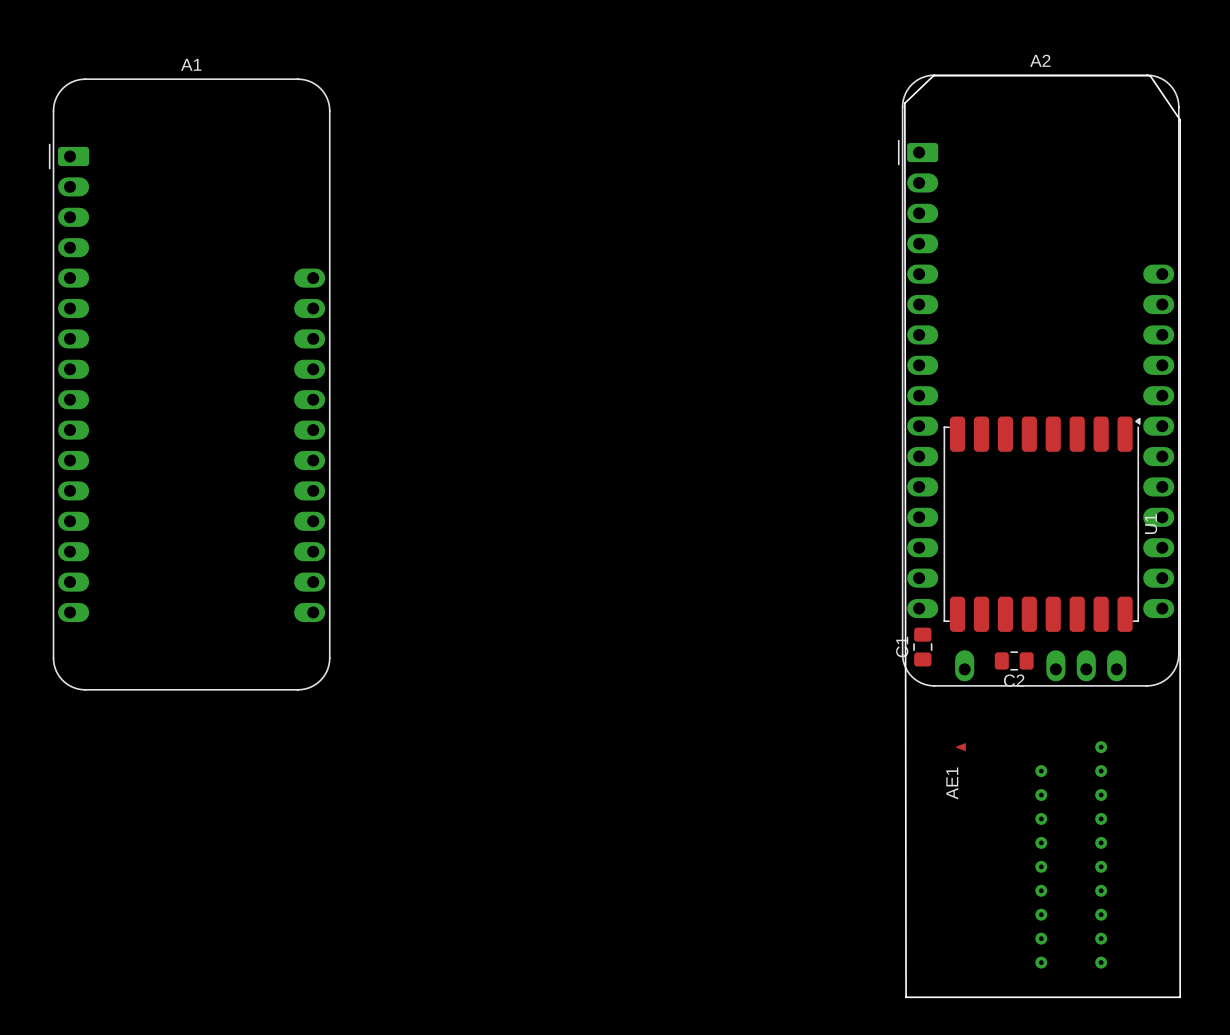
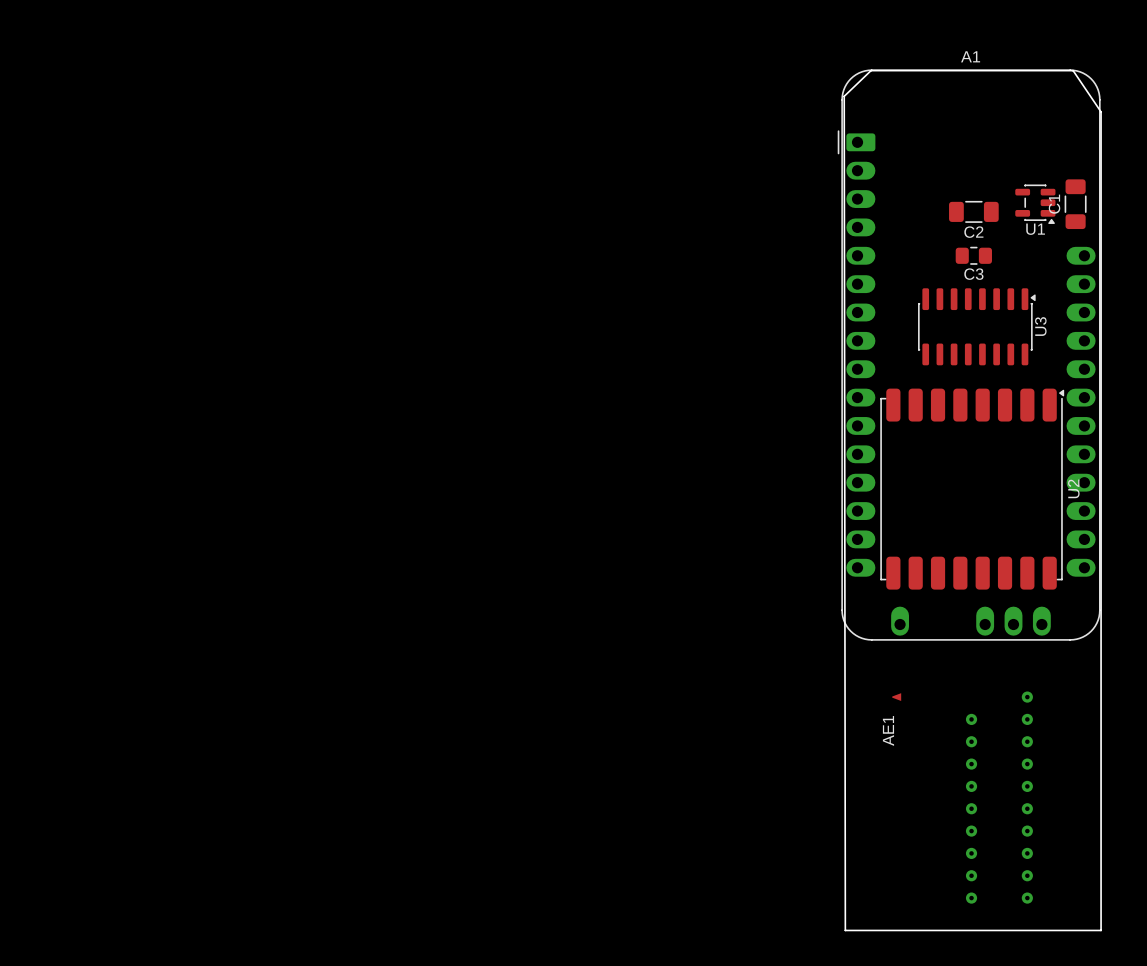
A2 name: A2 (1040, 60) -> A1 (970, 56)
U1: none -> (1035, 204)
C3: none -> (973, 255)
U3: none -> (976, 326)
A1: (189, 384) -> none
U1 name: U1 (1151, 523) -> U2 (1073, 488)
C1 footprint: [913, 627, 933, 667] -> [1064, 179, 1087, 230]
C2 footprint: [994, 651, 1034, 671] -> [949, 201, 999, 223]

